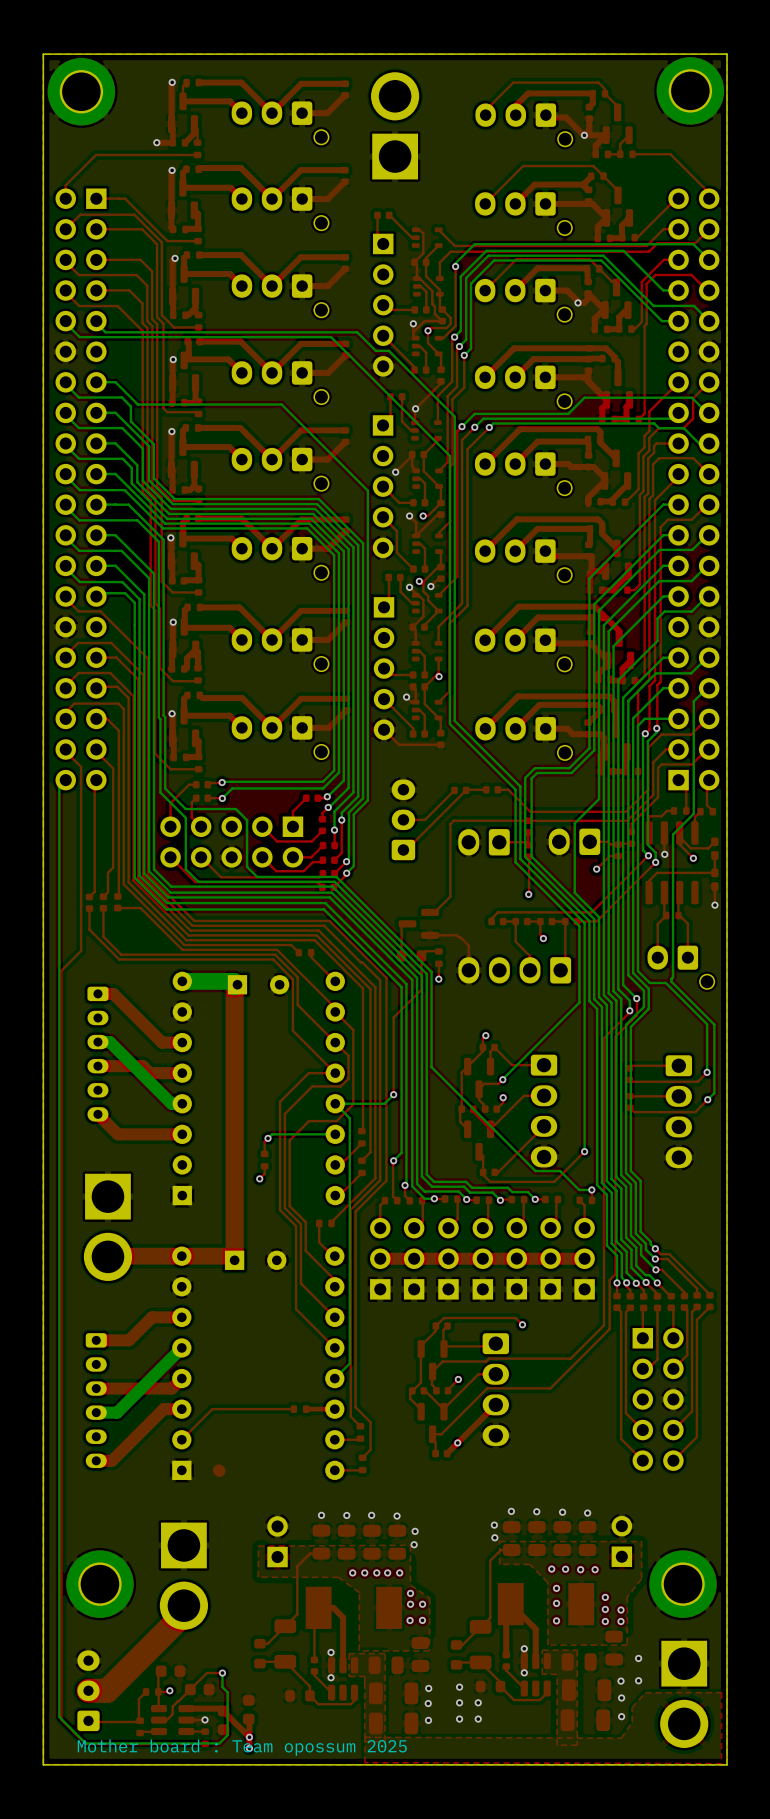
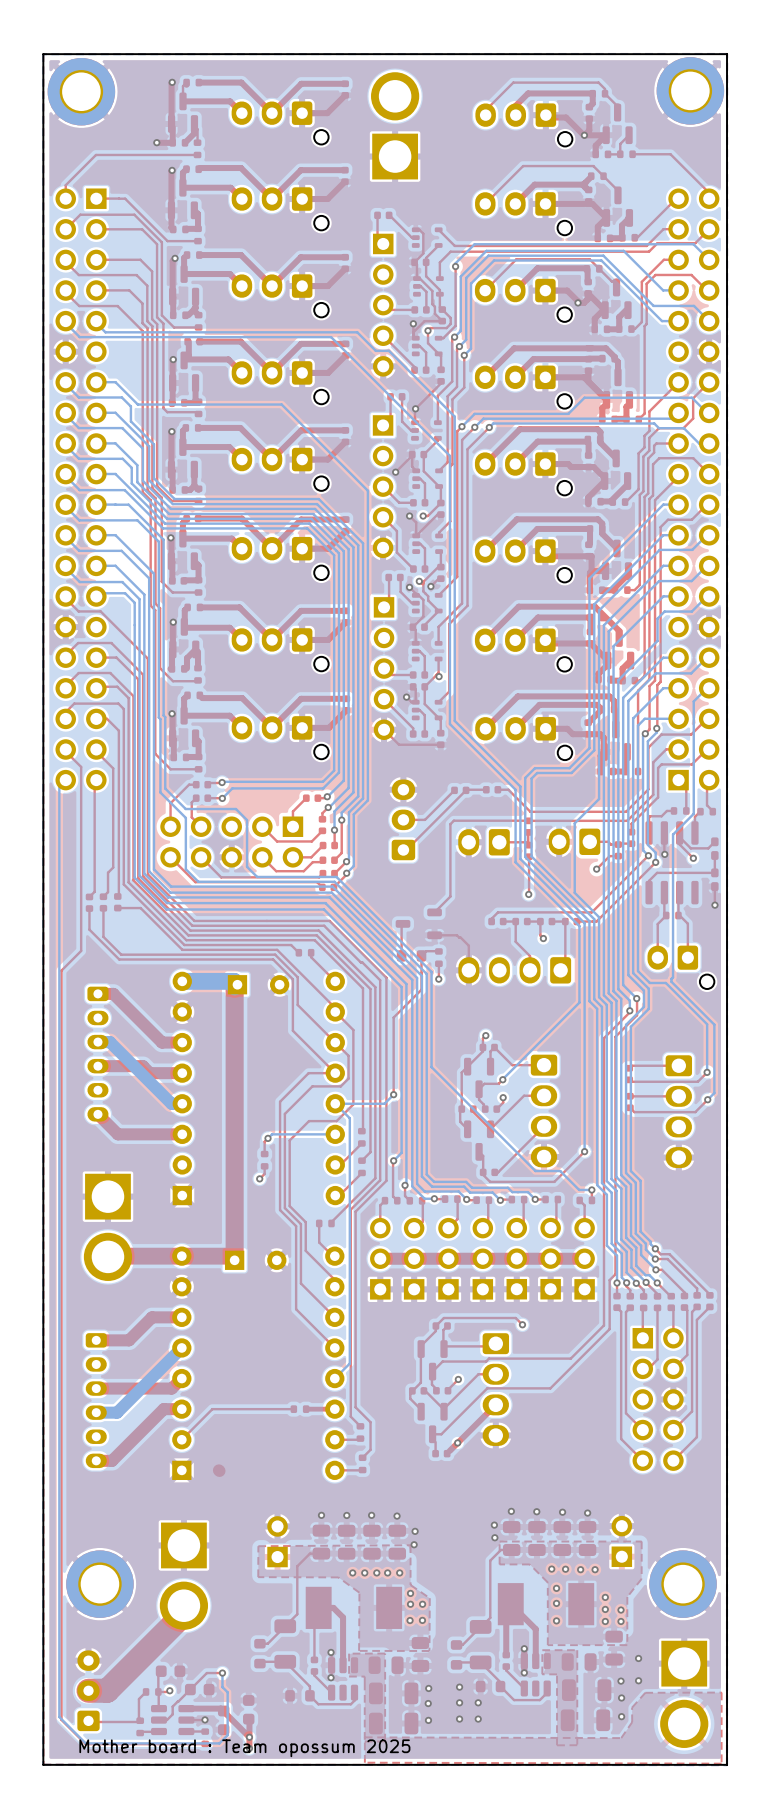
part footprint: [398, 908, 439, 939] -> [395, 908, 442, 940]

